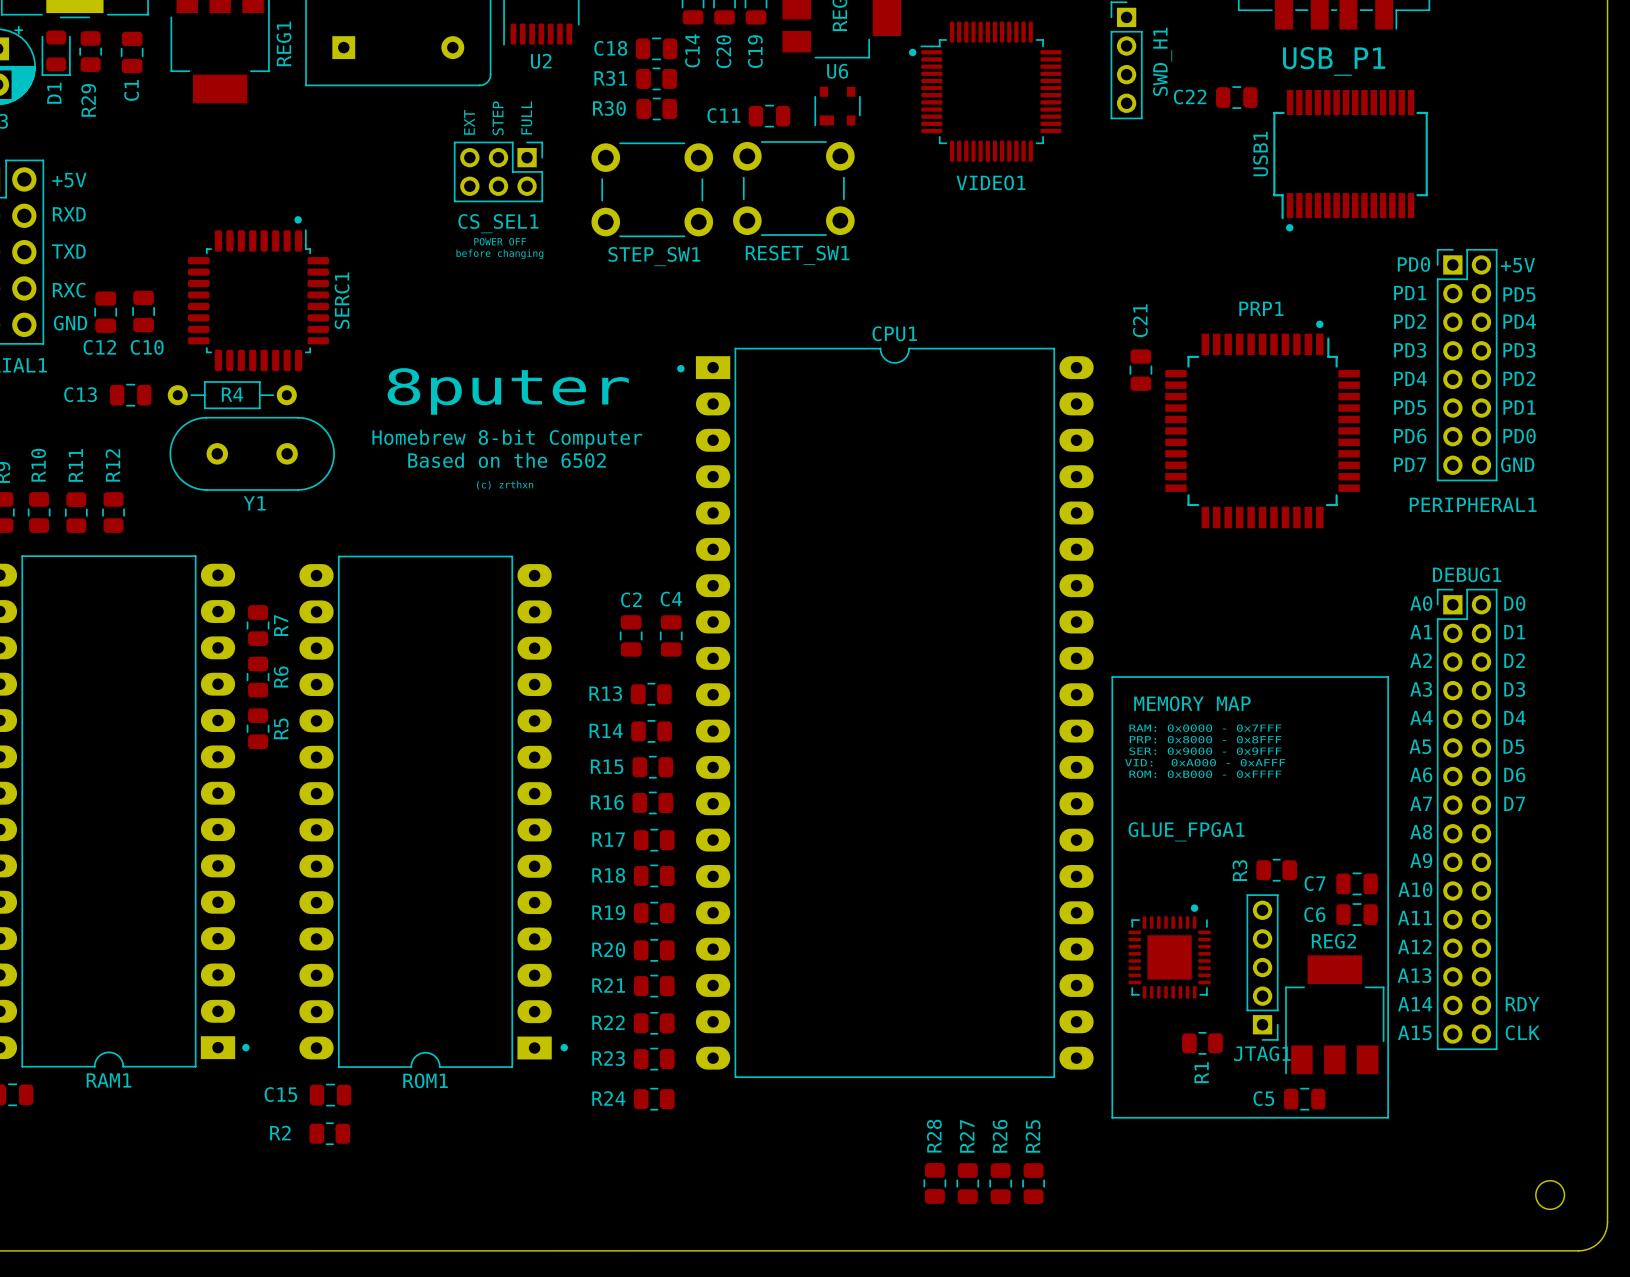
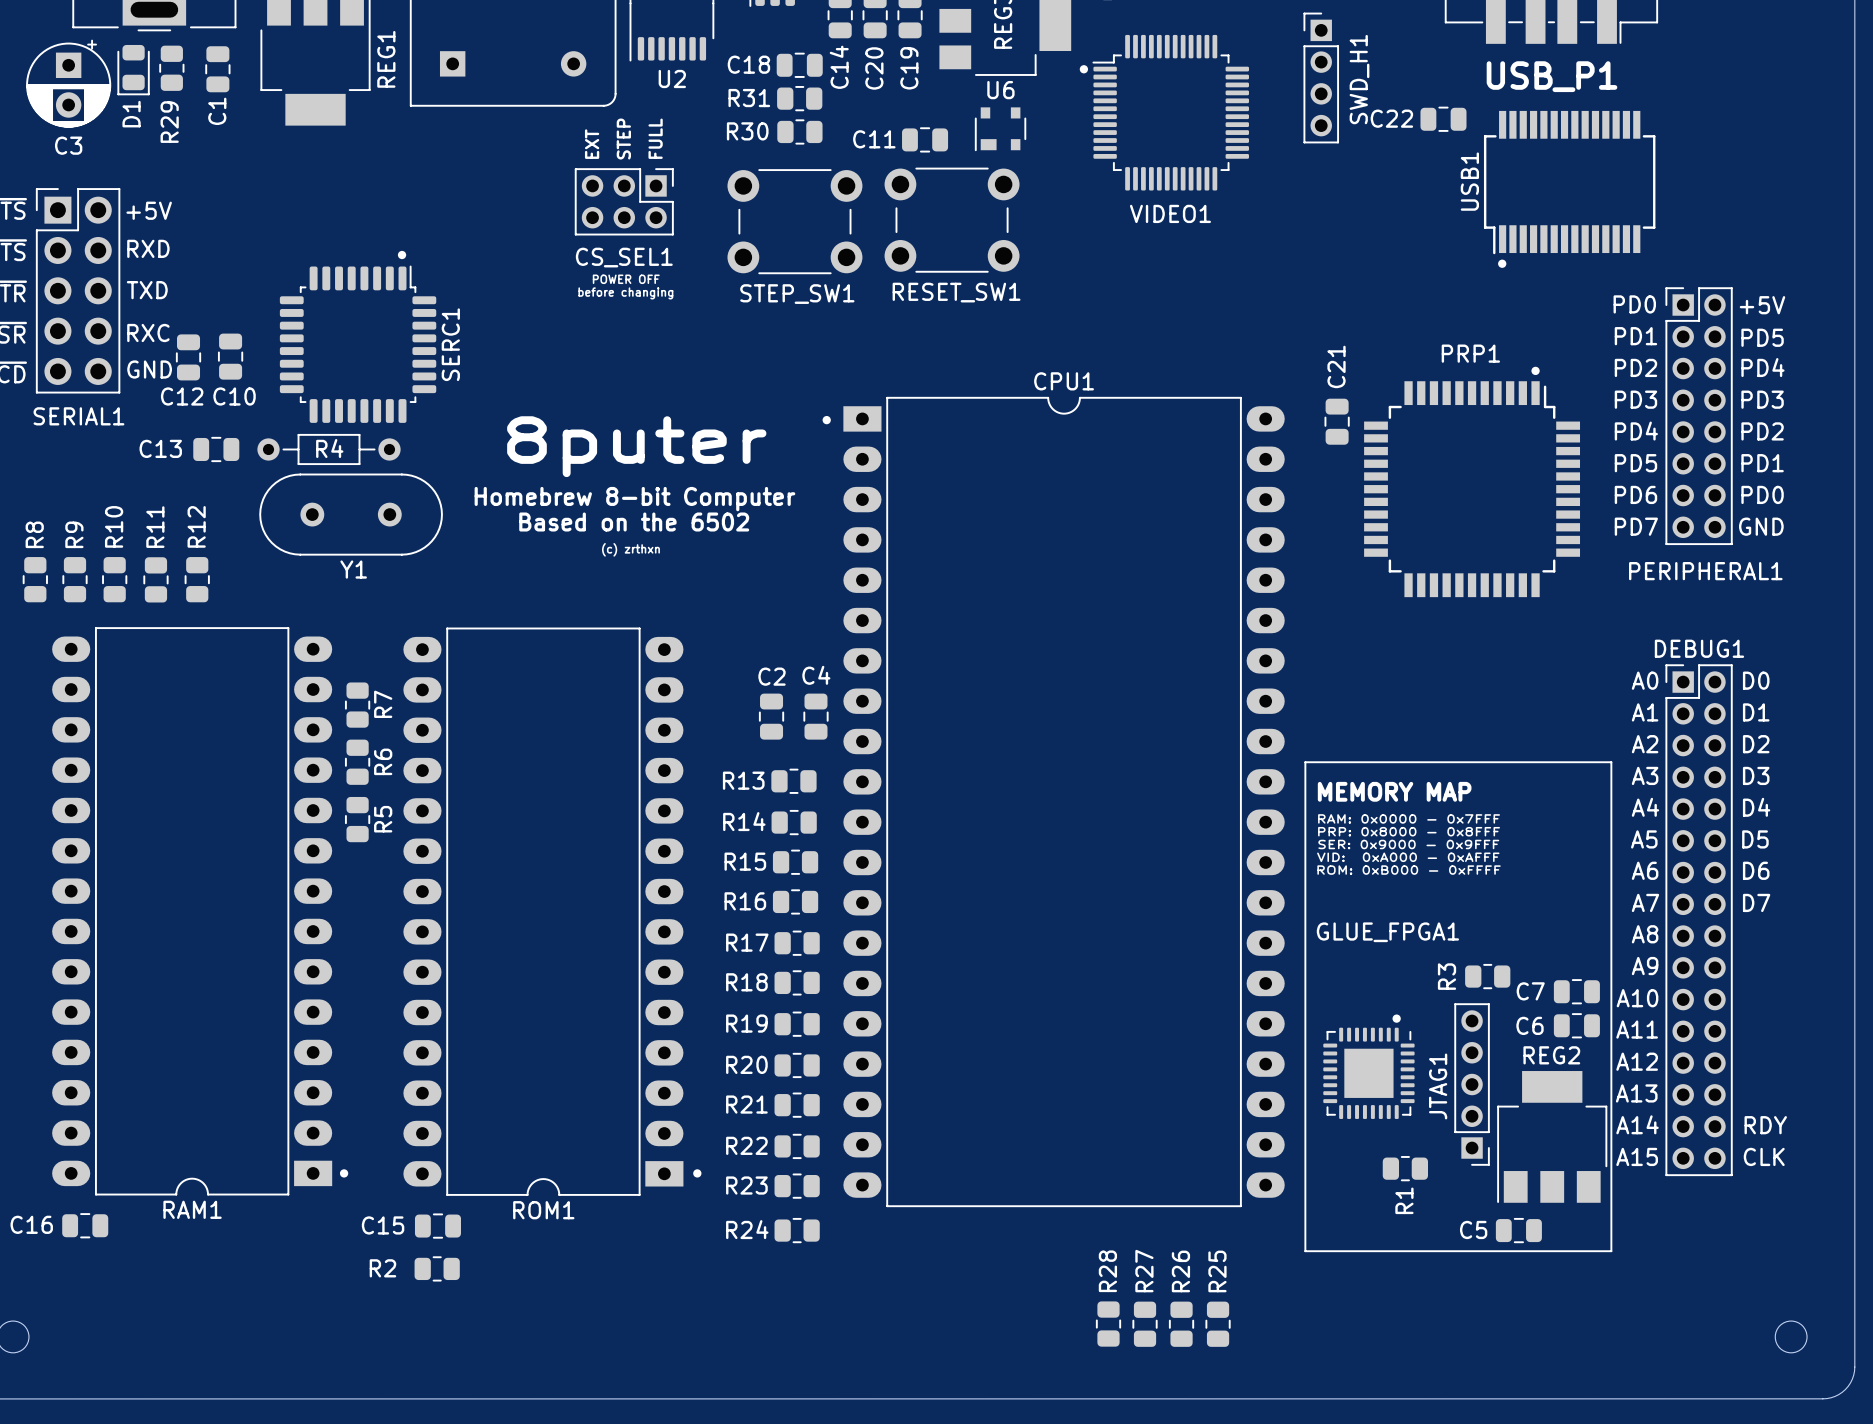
JTAG1 name rotation: 0° (1262, 1053) -> 90° counterclockwise (1438, 1086)
JTAG1 name position: JTAG1 (1262, 1053) -> JTAG1 (1438, 1086)

